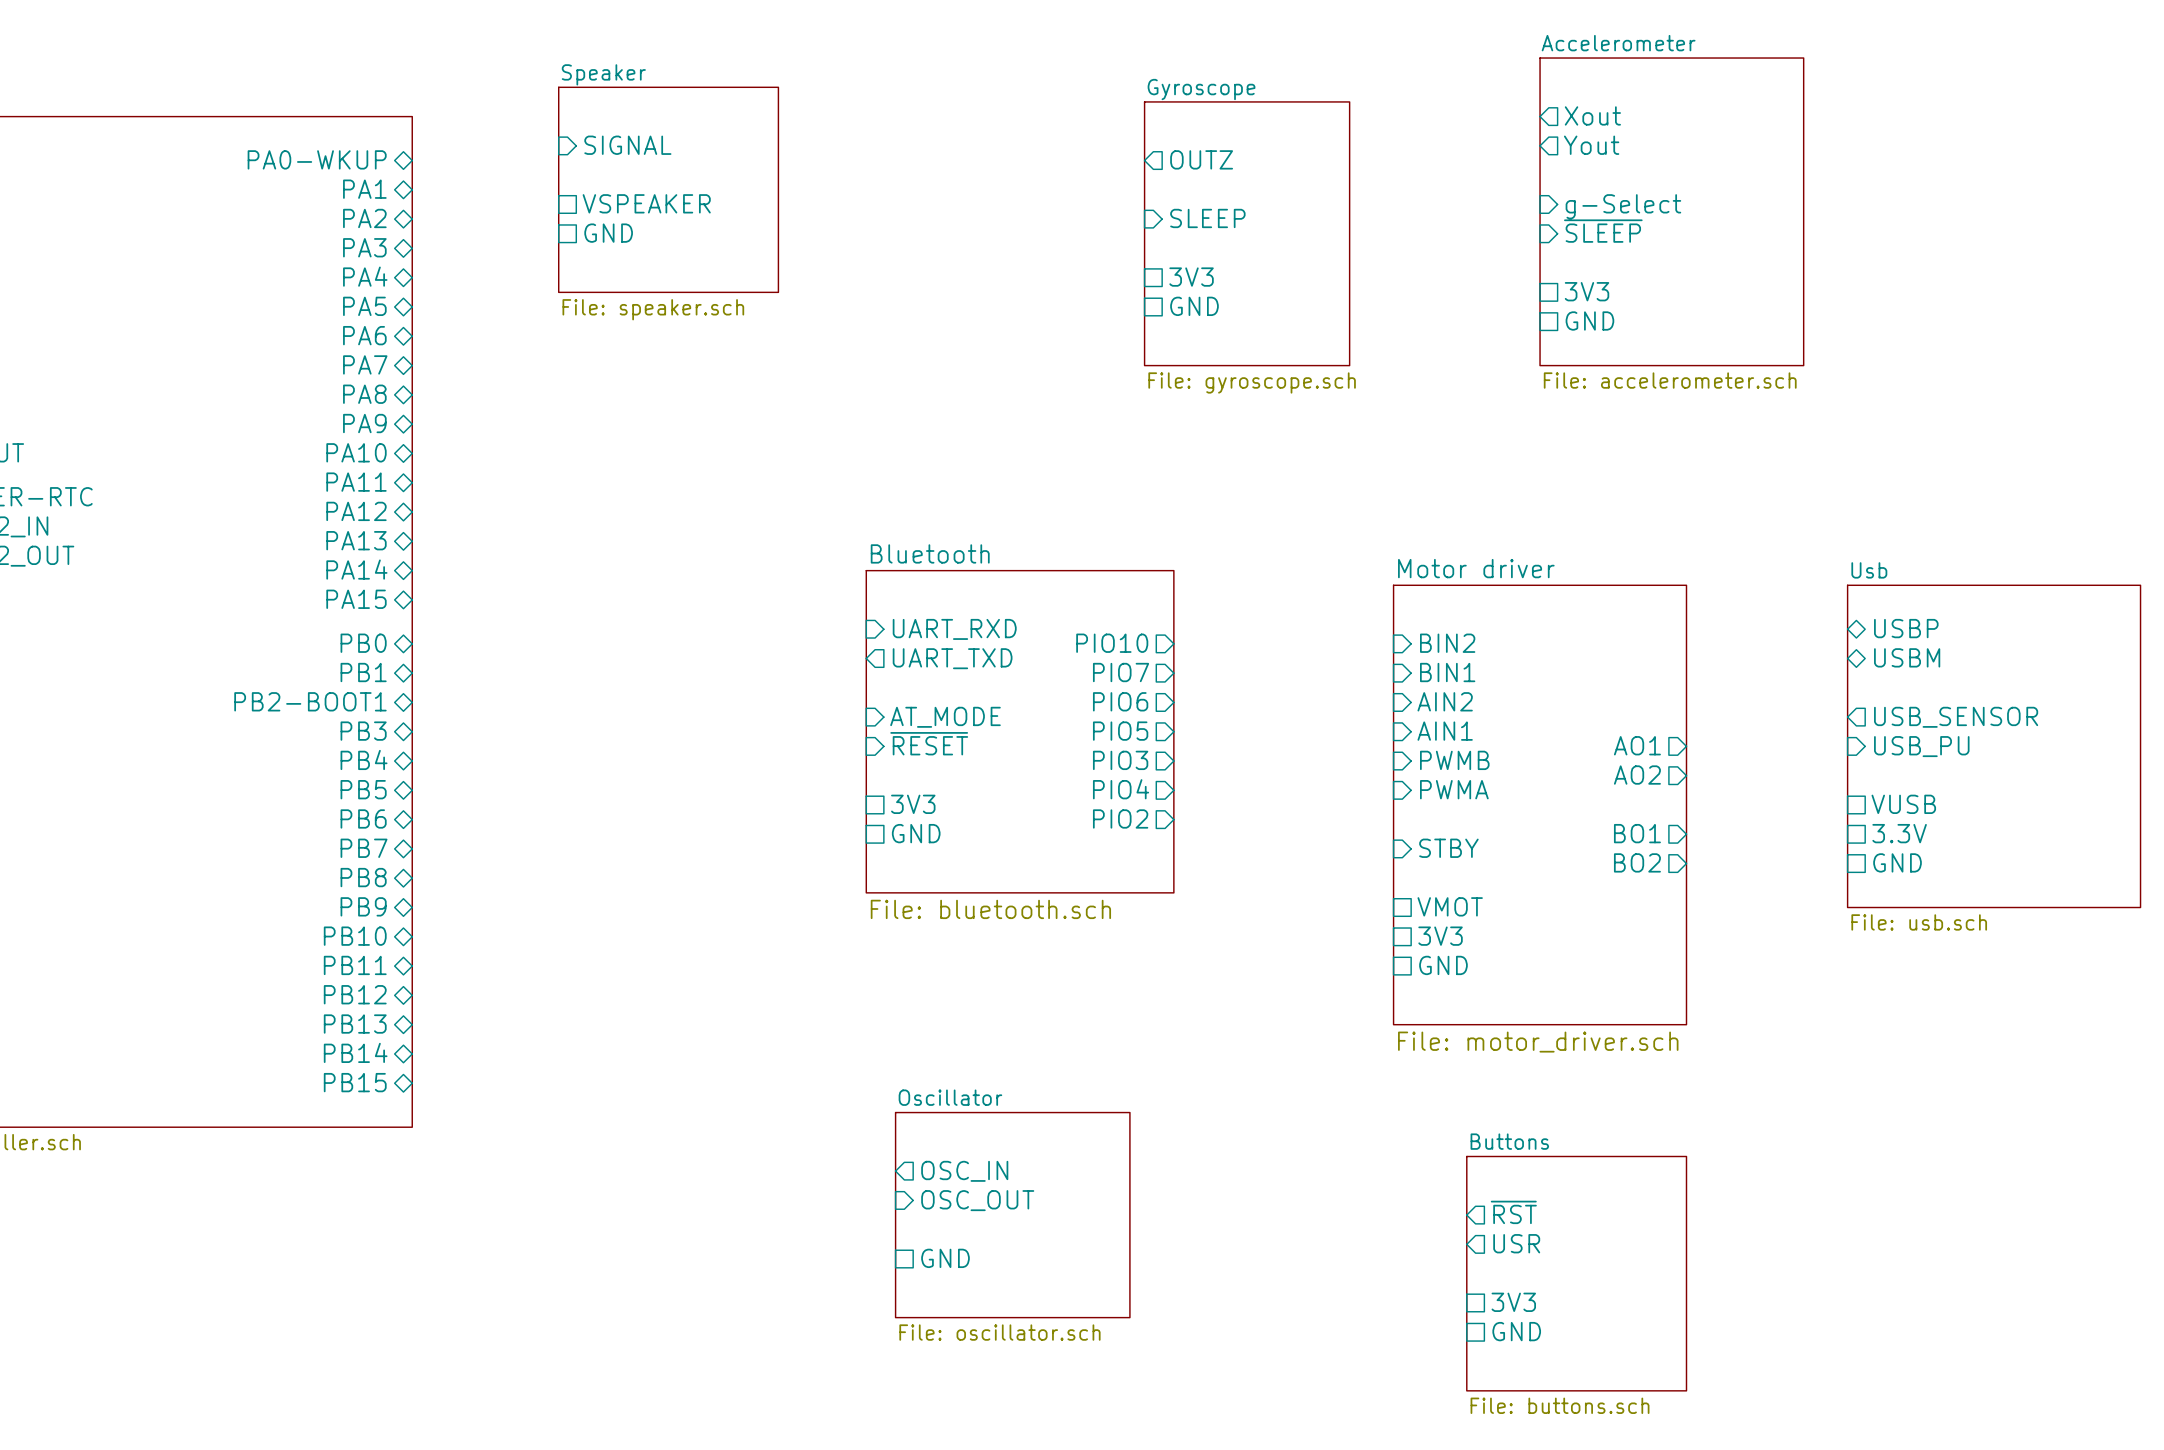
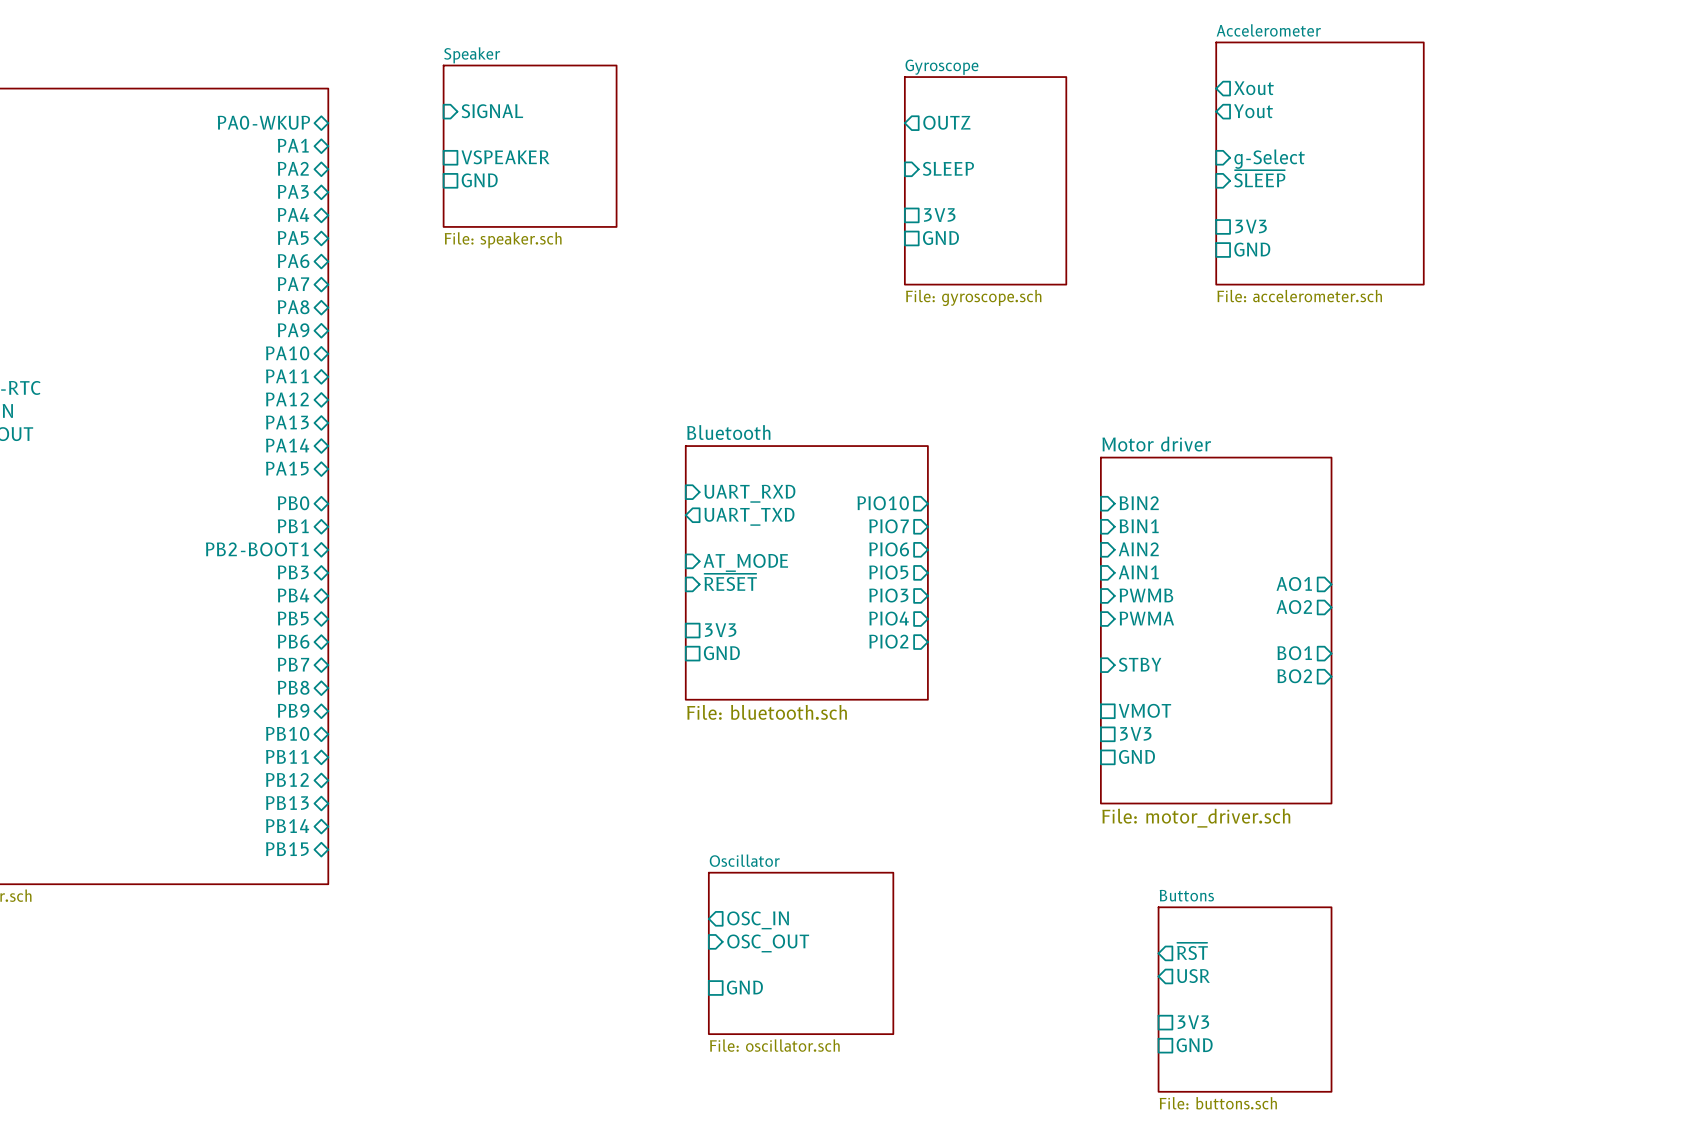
sheet pin: USBP (1906, 628) -> none
sheet pin: USBM (1907, 657) -> none
sheet pin: USB_SENSOR (1956, 717) -> none
sheet pin: USB_PU (1921, 746) -> none
sheet Usb: File: usb.sch (1994, 746) -> none
sheet pin: VUSB (1903, 804) -> none
sheet pin: 3.3V (1899, 833) -> none
sheet pin: GND (1897, 862) -> none

